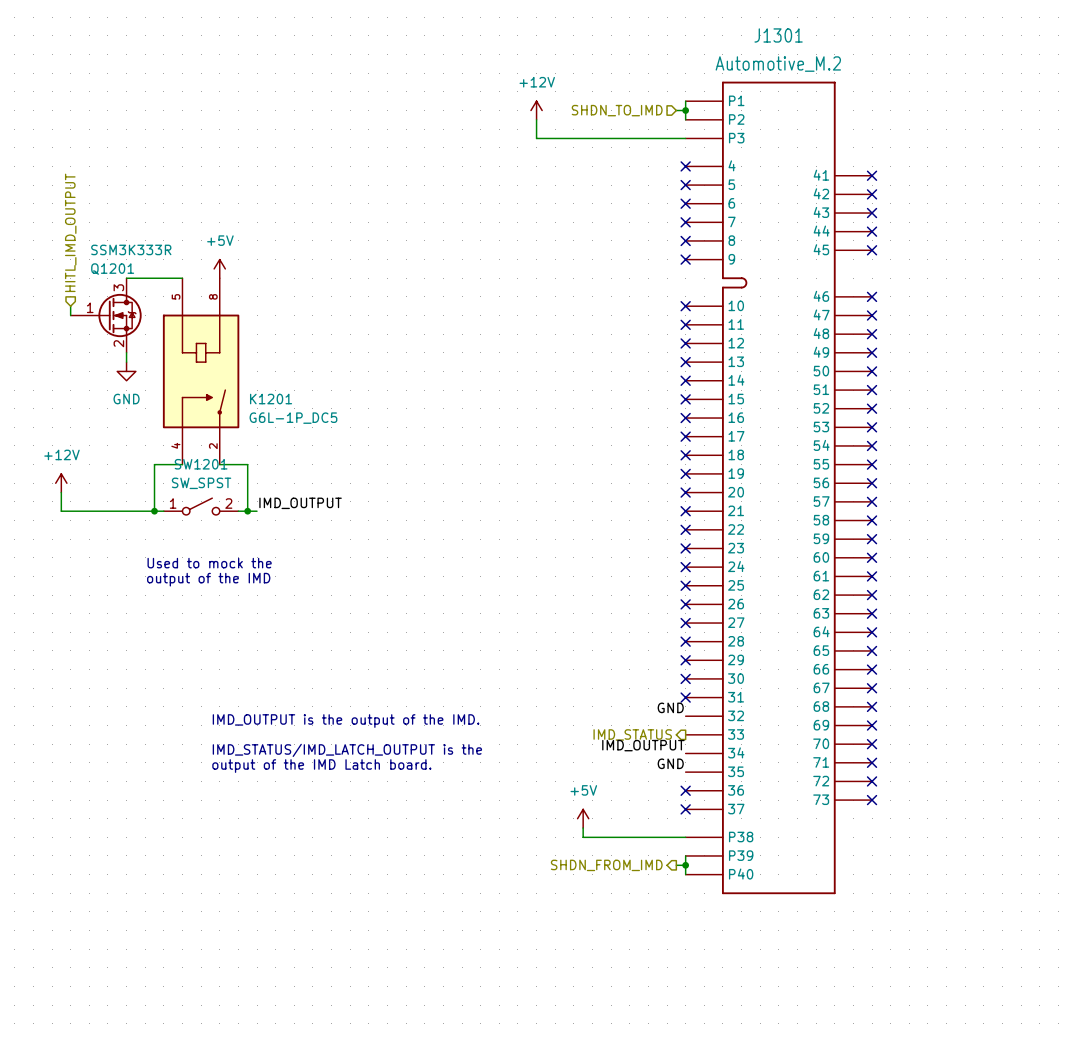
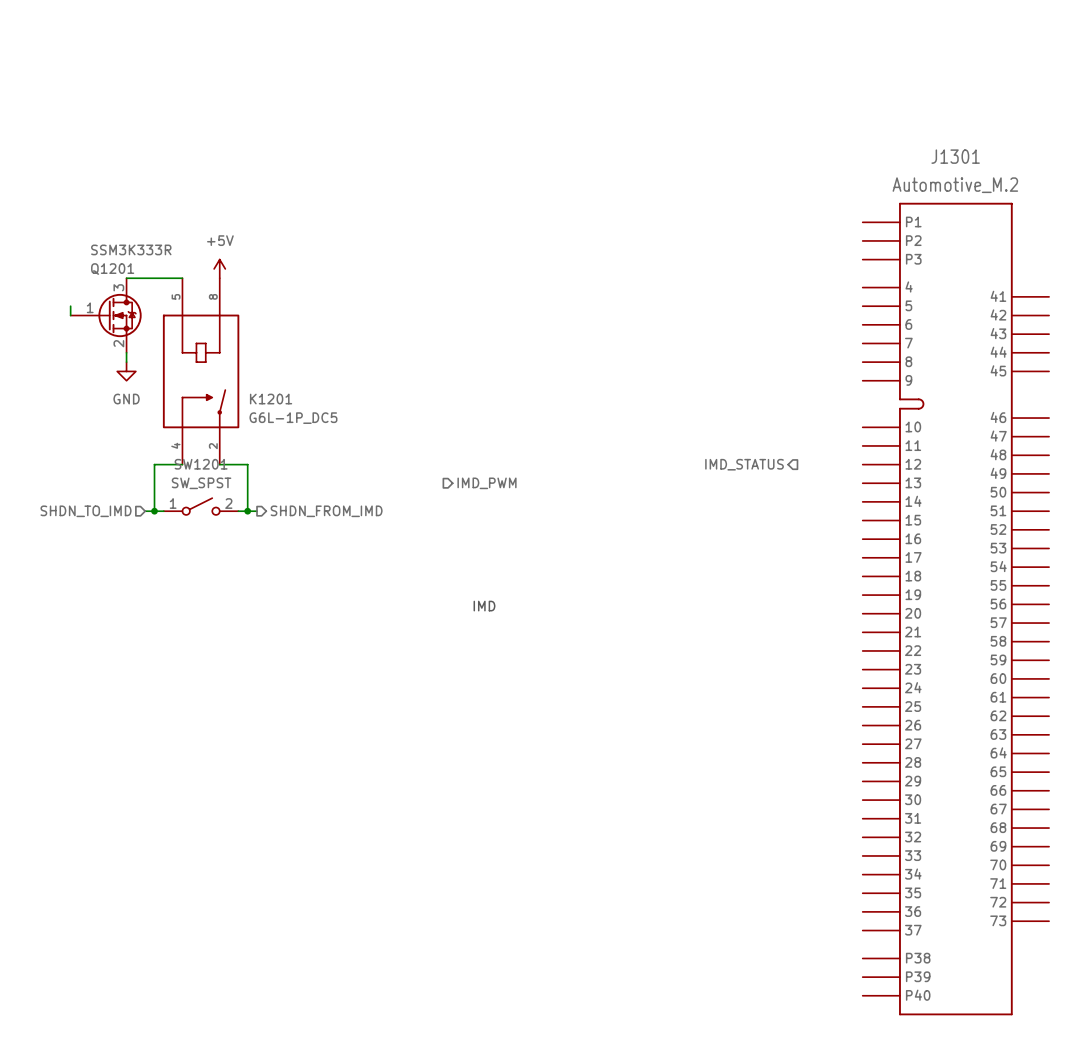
wire: (685, 101) (685, 119) -> none
power symbol: +12V (536, 110) -> none
hierarchical label: SHDN_TO_IMD (617, 110) -> none
wire: (676, 110) (685, 110) -> none
junction: (685, 110) -> none
wire: (536, 119) (536, 138) (685, 138) -> none
no-connect mark: (685, 166) -> none
no-connect mark: (872, 175) -> none
no-connect mark: (685, 185) -> none
no-connect mark: (872, 194) -> none
no-connect mark: (685, 203) -> none
no-connect mark: (872, 213) -> none
no-connect mark: (685, 222) -> none
no-connect mark: (872, 231) -> none
hierarchical label: HITL_IMD_OUTPUT (70, 232) -> none
no-connect mark: (685, 240) -> none
no-connect mark: (872, 250) -> none
no-connect mark: (685, 259) -> none
no-connect mark: (872, 296) -> none
no-connect mark: (685, 306) -> none
no-connect mark: (872, 315) -> none
no-connect mark: (685, 324) -> none
no-connect mark: (872, 334) -> none
no-connect mark: (685, 343) -> none
no-connect mark: (872, 352) -> none
no-connect mark: (685, 362) -> none
no-connect mark: (872, 371) -> none
no-connect mark: (685, 380) -> none
no-connect mark: (872, 390) -> none
no-connect mark: (685, 399) -> none
no-connect mark: (872, 408) -> none
no-connect mark: (685, 418) -> none
no-connect mark: (872, 427) -> none
no-connect mark: (685, 436) -> none
no-connect mark: (872, 445) -> none
no-connect mark: (685, 455) -> none
hierarchical label: none -> IMD_STATUS (744, 464)
no-connect mark: (872, 464) -> none
no-connect mark: (685, 473) -> none
power symbol: +12V (61, 483) -> none
hierarchical label: none -> IMD_PWM (487, 483)
no-connect mark: (872, 483) -> none
J1301 position: (778, 487) -> (955, 609)
wire: (61, 492) (61, 511) (145, 511) -> none
no-connect mark: (685, 492) -> none
no-connect mark: (872, 501) -> none
label: IMD_OUTPUT (300, 503) -> none
hierarchical label: none -> SHDN_TO_IMD (86, 511)
hierarchical label: none -> SHDN_FROM_IMD (326, 511)
no-connect mark: (685, 511) -> none
no-connect mark: (872, 520) -> none
no-connect mark: (685, 529) -> none
no-connect mark: (872, 539) -> none
no-connect mark: (685, 548) -> none
no-connect mark: (872, 557) -> none
text: Used to mock the (209, 563) -> none
no-connect mark: (685, 567) -> none
no-connect mark: (872, 576) -> none
text: output of the IMD (208, 579) -> none
no-connect mark: (685, 585) -> none
no-connect mark: (872, 595) -> none
no-connect mark: (685, 604) -> none
text: none -> IMD (484, 606)
no-connect mark: (872, 613) -> none
no-connect mark: (685, 623) -> none
no-connect mark: (872, 632) -> none
no-connect mark: (685, 641) -> none
no-connect mark: (872, 650) -> none
no-connect mark: (685, 660) -> none
no-connect mark: (872, 669) -> none
no-connect mark: (685, 678) -> none
no-connect mark: (872, 688) -> none
no-connect mark: (685, 697) -> none
no-connect mark: (872, 706) -> none
label: GND (670, 707) -> none
text: IMD_OUTPUT is the output of the IMD. (346, 721) -> none
no-connect mark: (872, 725) -> none
hierarchical label: IMD_STATUS (632, 734) -> none
no-connect mark: (872, 744) -> none
label: IMD_OUTPUT (643, 745) -> none
text: IMD_STATUS/IMD_LATCH_OUTPUT is the (347, 750) -> none
no-connect mark: (872, 762) -> none
label: GND (670, 763) -> none
text: output of the IMD Latch board. (321, 766) -> none
no-connect mark: (872, 781) -> none
no-connect mark: (685, 790) -> none
no-connect mark: (872, 800) -> none
no-connect mark: (685, 809) -> none
power symbol: +5V (583, 818) -> none
wire: (583, 828) (583, 837) (685, 837) -> none
wire: (685, 855) (685, 874) -> none
hierarchical label: SHDN_FROM_IMD (606, 865) -> none
wire: (676, 865) (685, 865) -> none
junction: (685, 865) -> none

